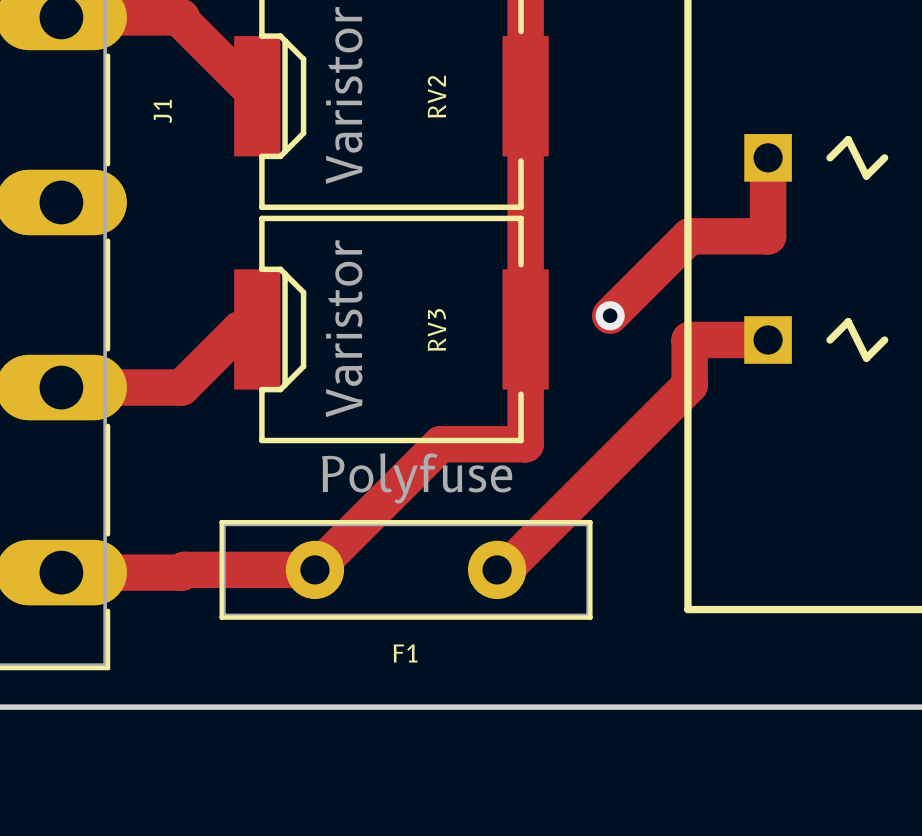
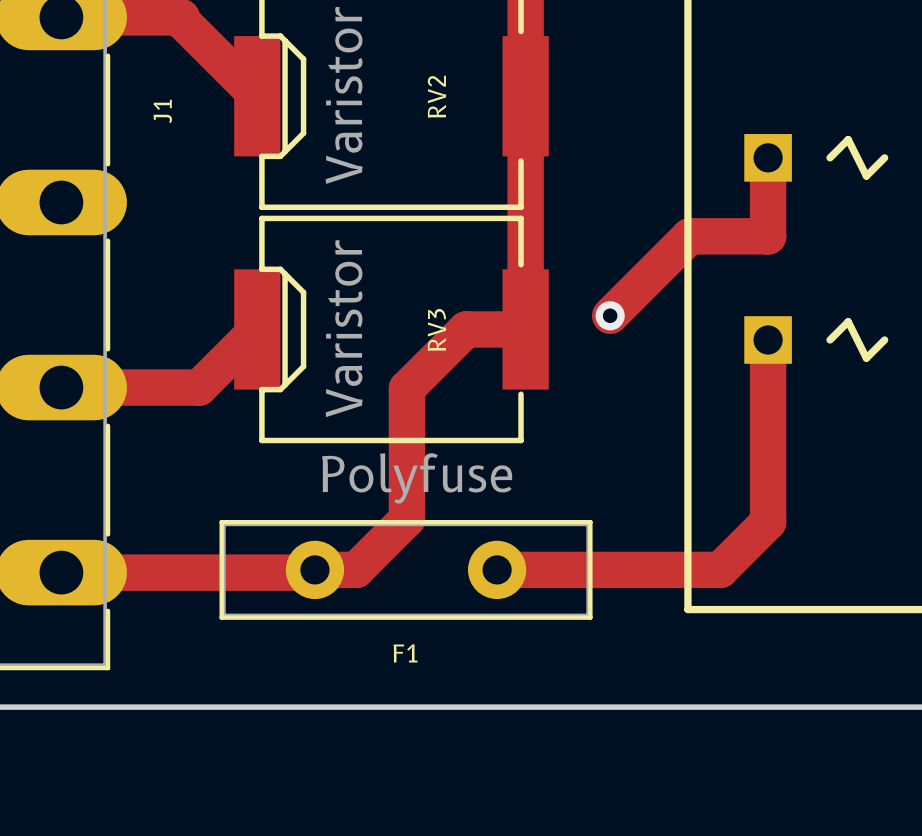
track: (257, 329) (239, 329) (181, 387) -> (257, 329) (199, 387) (181, 387)
track: (525, 329) (525, 444) (440, 444) (314, 569) (184, 569) (181, 572) -> (525, 329) (466, 329) (406, 388) (406, 519) (356, 569) (314, 569) (312, 572) (181, 572)
track: (768, 339) (689, 339) (689, 385) (504, 569) -> (768, 339) (768, 522) (720, 569) (504, 569)

